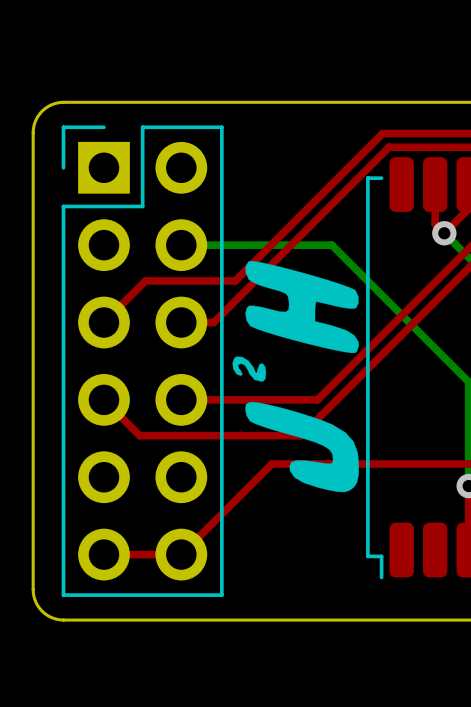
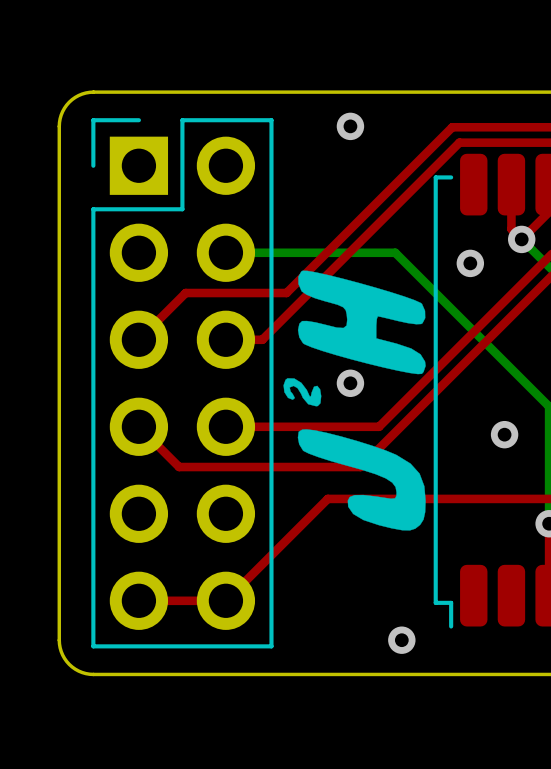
via: none -> (350, 126)
via: none -> (470, 263)
via: none -> (350, 383)
via: none -> (504, 434)
via: none -> (401, 640)

